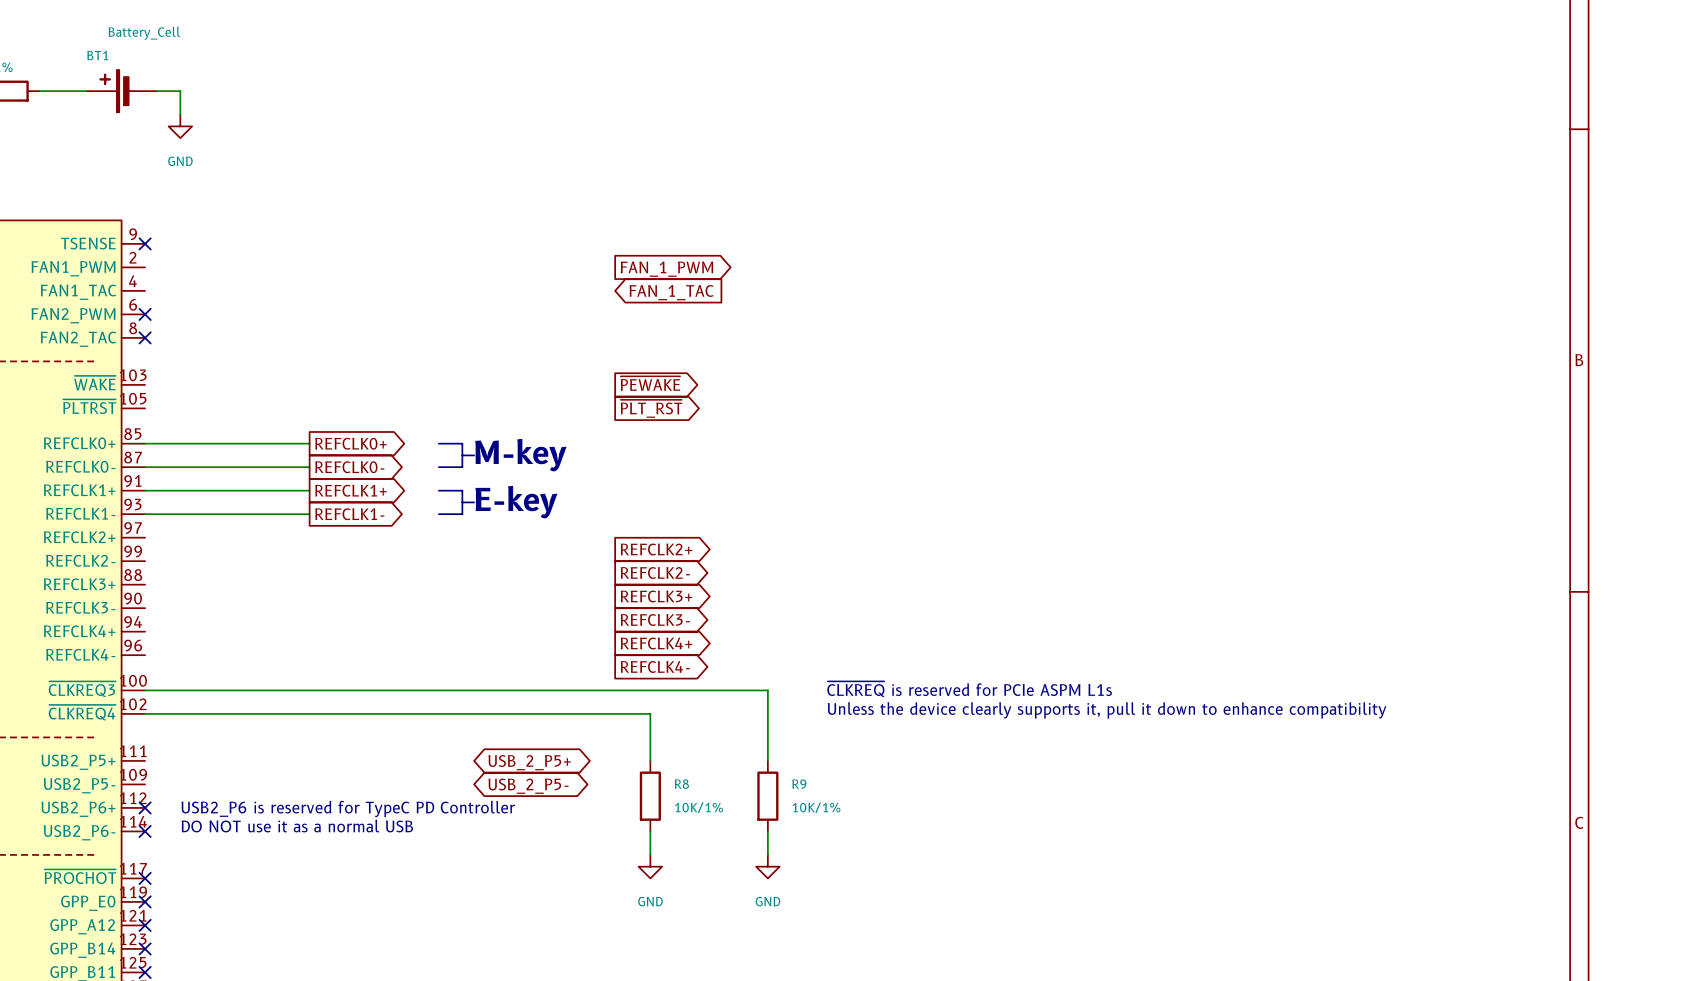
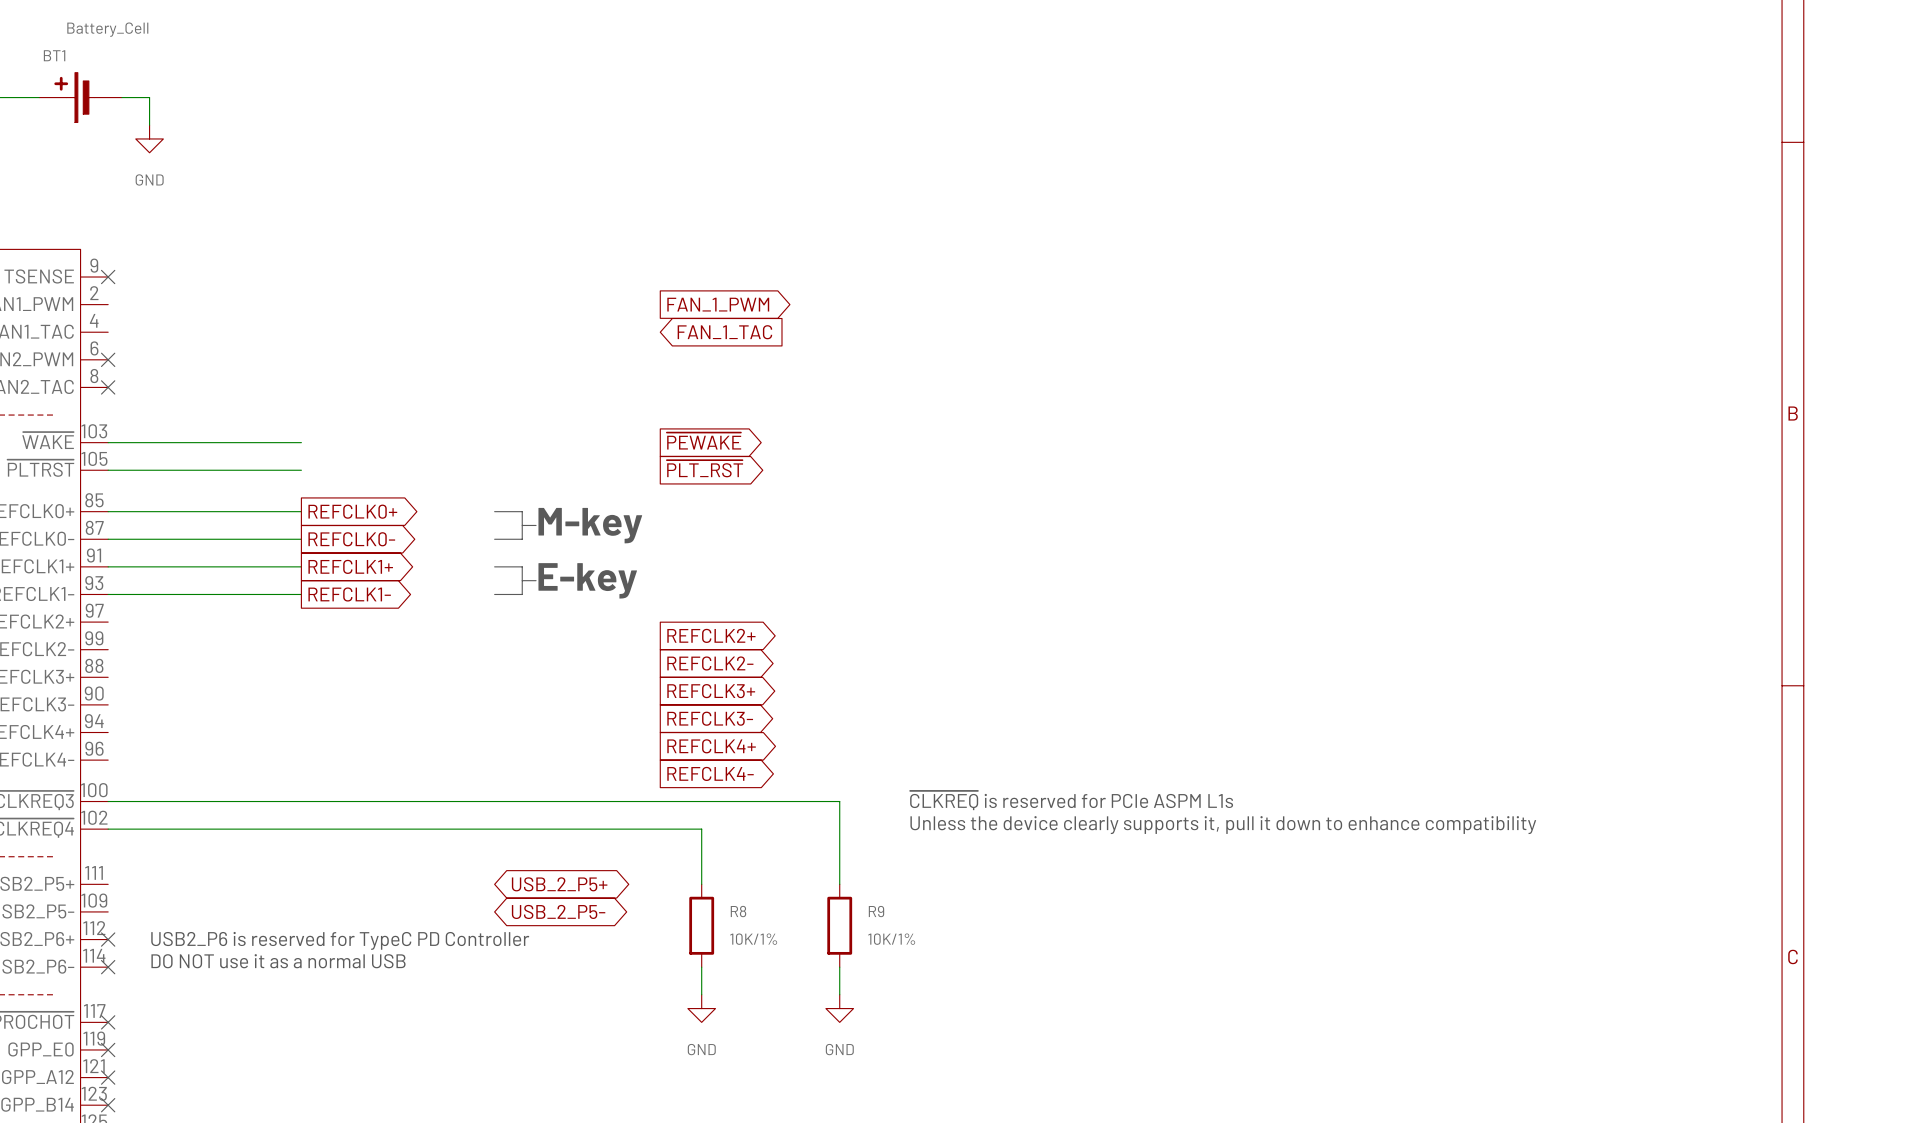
wire: none -> (108, 442) (301, 442)
wire: none -> (108, 470) (301, 470)
line: (438, 443) (462, 443) (462, 467) (438, 467) -> (494, 511) (522, 511) (522, 539) (494, 539)
line: (462, 455) (474, 455) -> (522, 525) (536, 525)
text position: M-key (520, 455) -> M-key (590, 525)
line: (438, 490) (462, 490) (462, 514) (438, 514) -> (494, 566) (522, 566) (522, 594) (494, 594)
line: (462, 502) (474, 502) -> (522, 580) (536, 580)
text position: E-key (516, 502) -> E-key (587, 580)

